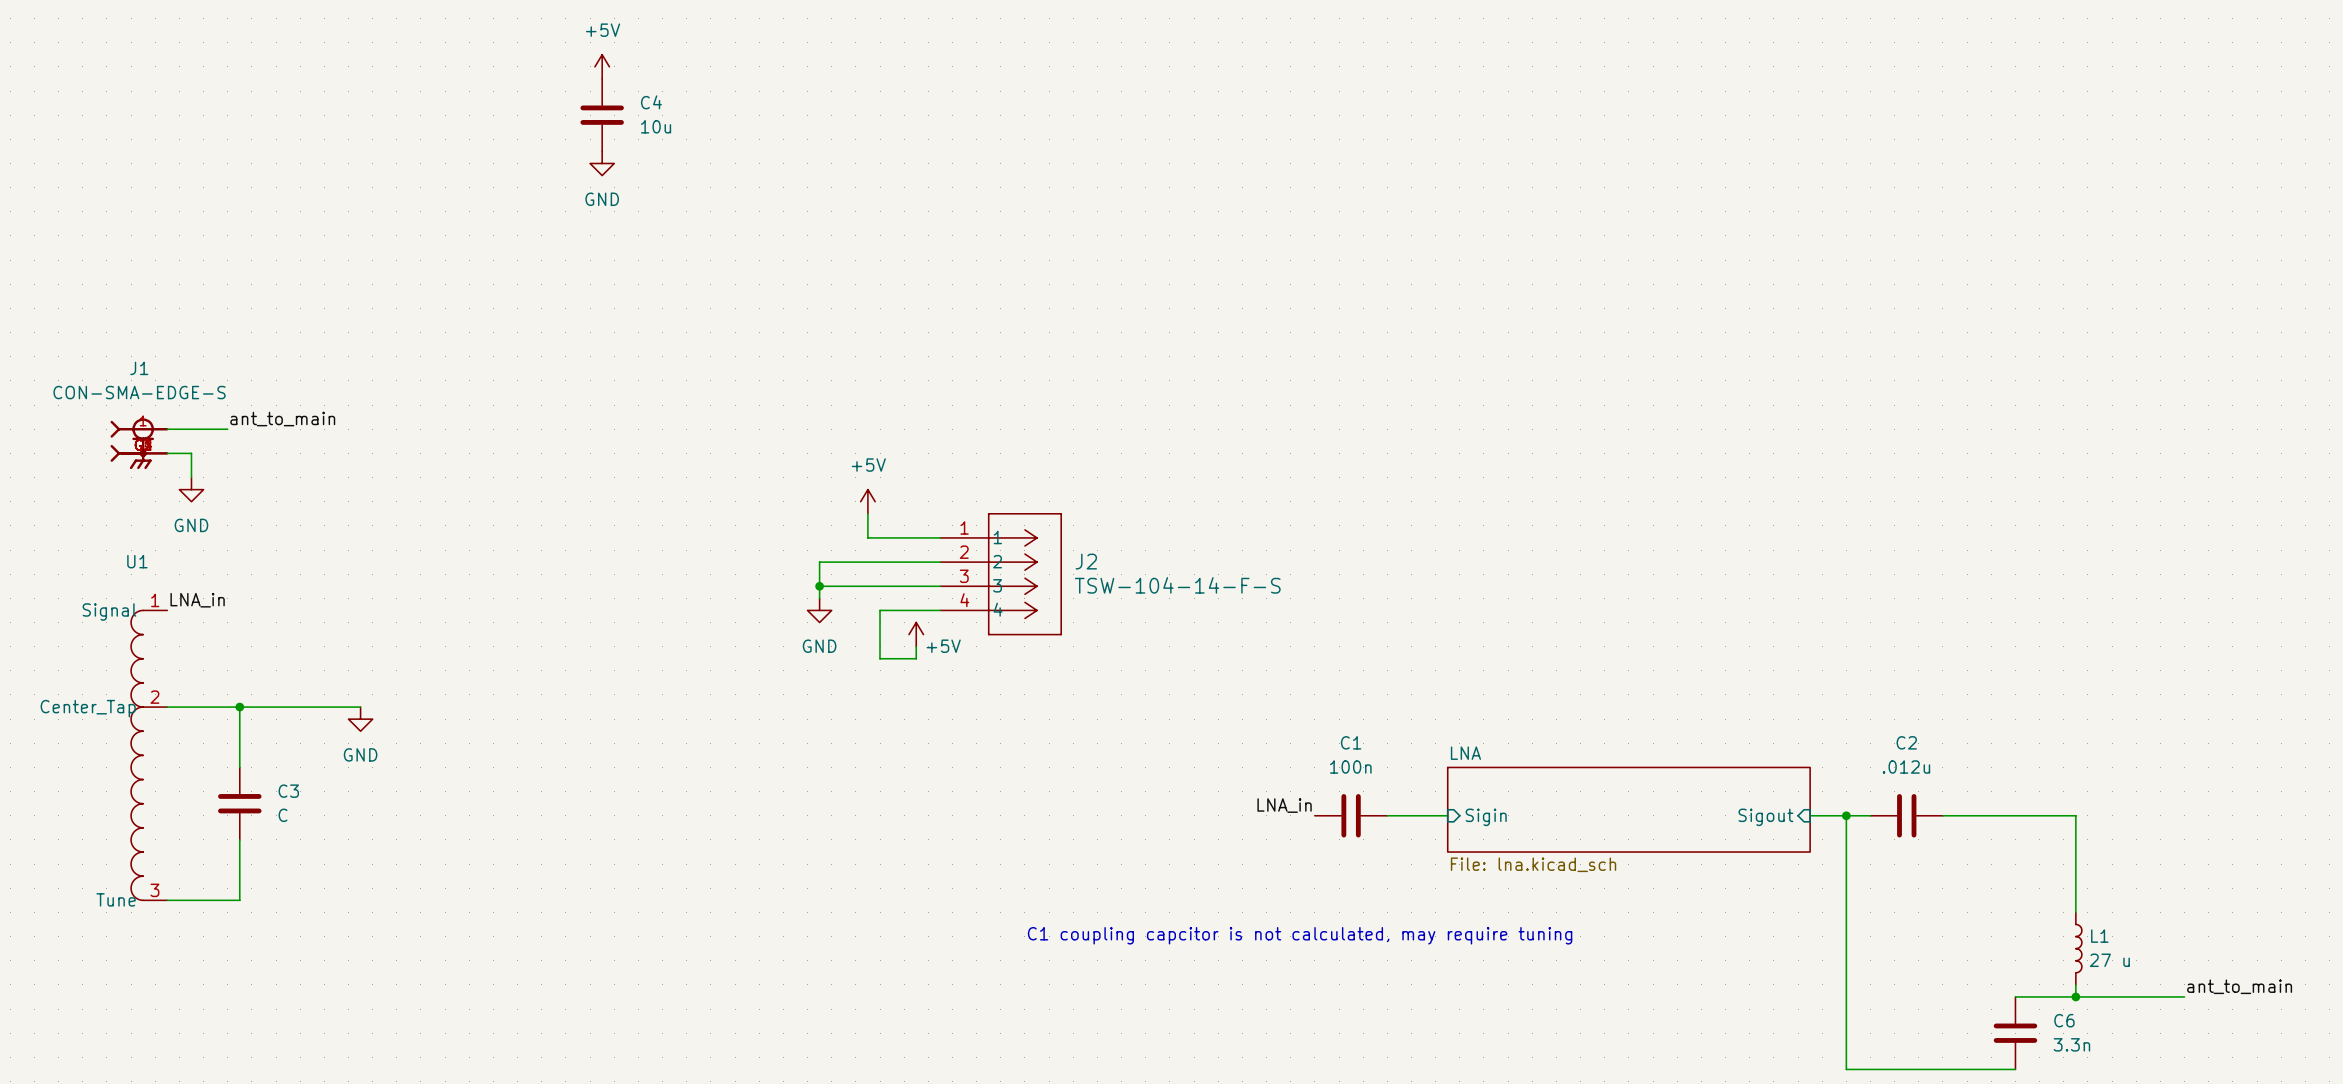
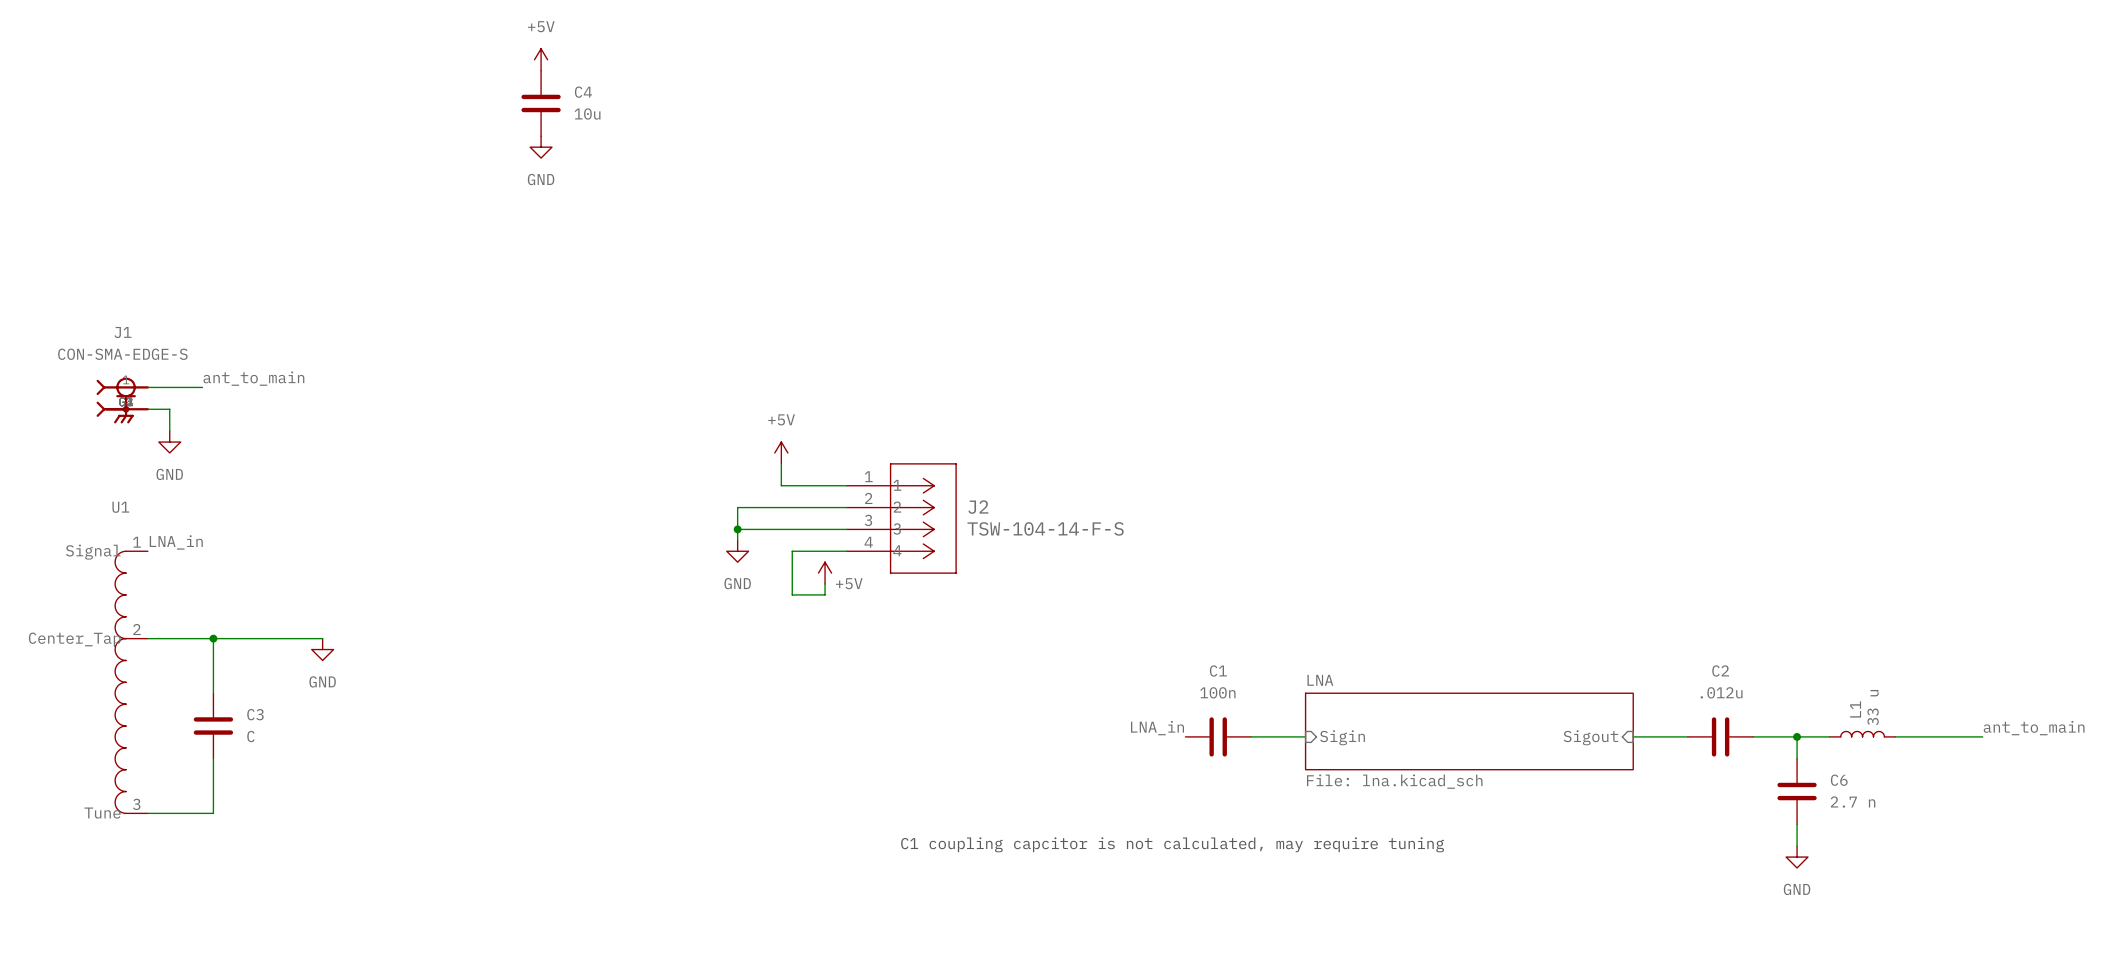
wire: (1846, 815) (1846, 1069) (2015, 1069) -> none
junction: (1846, 815) -> none
wire: none -> (1797, 736) (1797, 758)
junction: none -> (1797, 736)
wire: (2027, 815) (2075, 815) (2075, 912) -> none
wire: none -> (1895, 736) (1982, 736)
wire: none -> (1797, 824) (1797, 846)
power symbol: none -> GND (1797, 857)
L1 rotation: 0° (2078, 948) -> 90° counterclockwise (1862, 734)
L1 position: (2078, 948) -> (1862, 734)
L1 value: 27 u (2109, 960) -> 33 u (1873, 707)
wire: (2075, 984) (2075, 996) -> none
label position: ant_to_main (2239, 986) -> ant_to_main (2034, 728)
wire: (2015, 996) (2184, 996) -> none
junction: (2075, 996) -> none
C6 position: (2015, 1033) -> (1797, 791)
C6 value: 3.3n (2071, 1044) -> 2.7 n (1853, 802)

